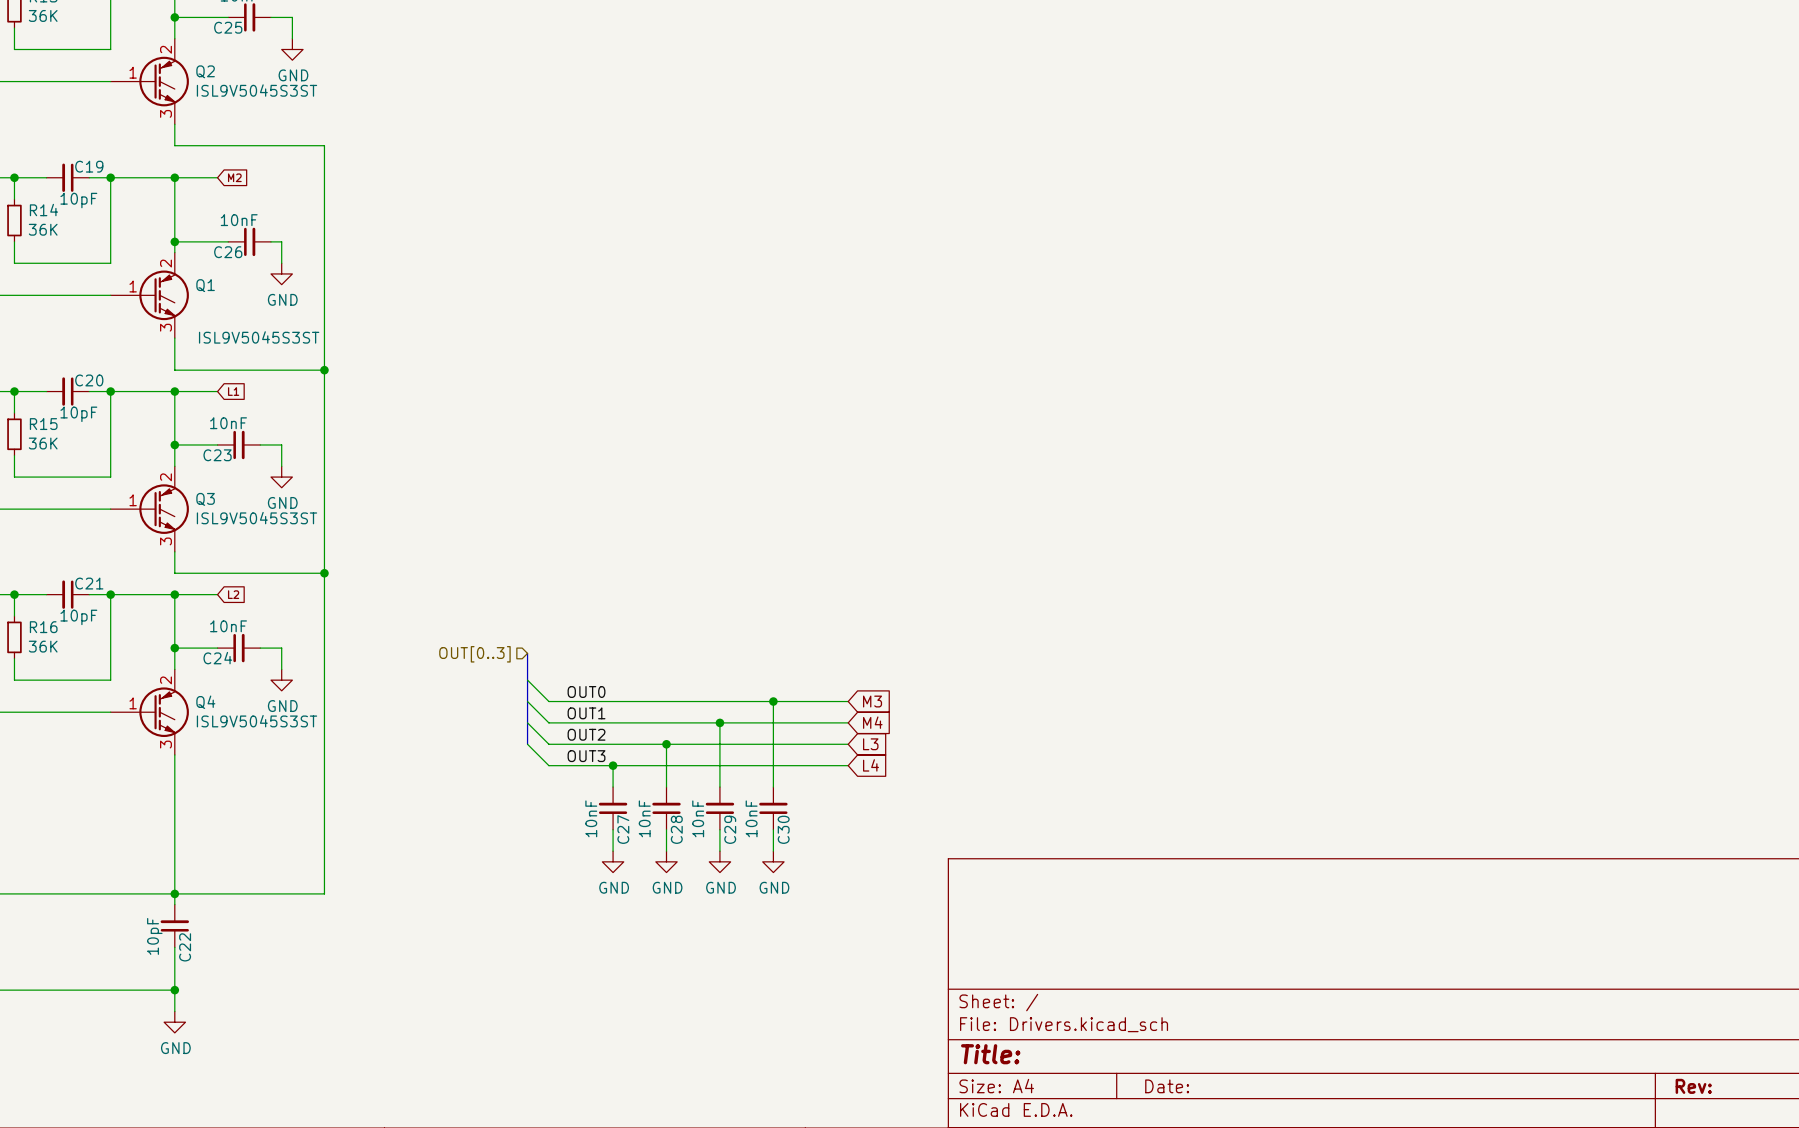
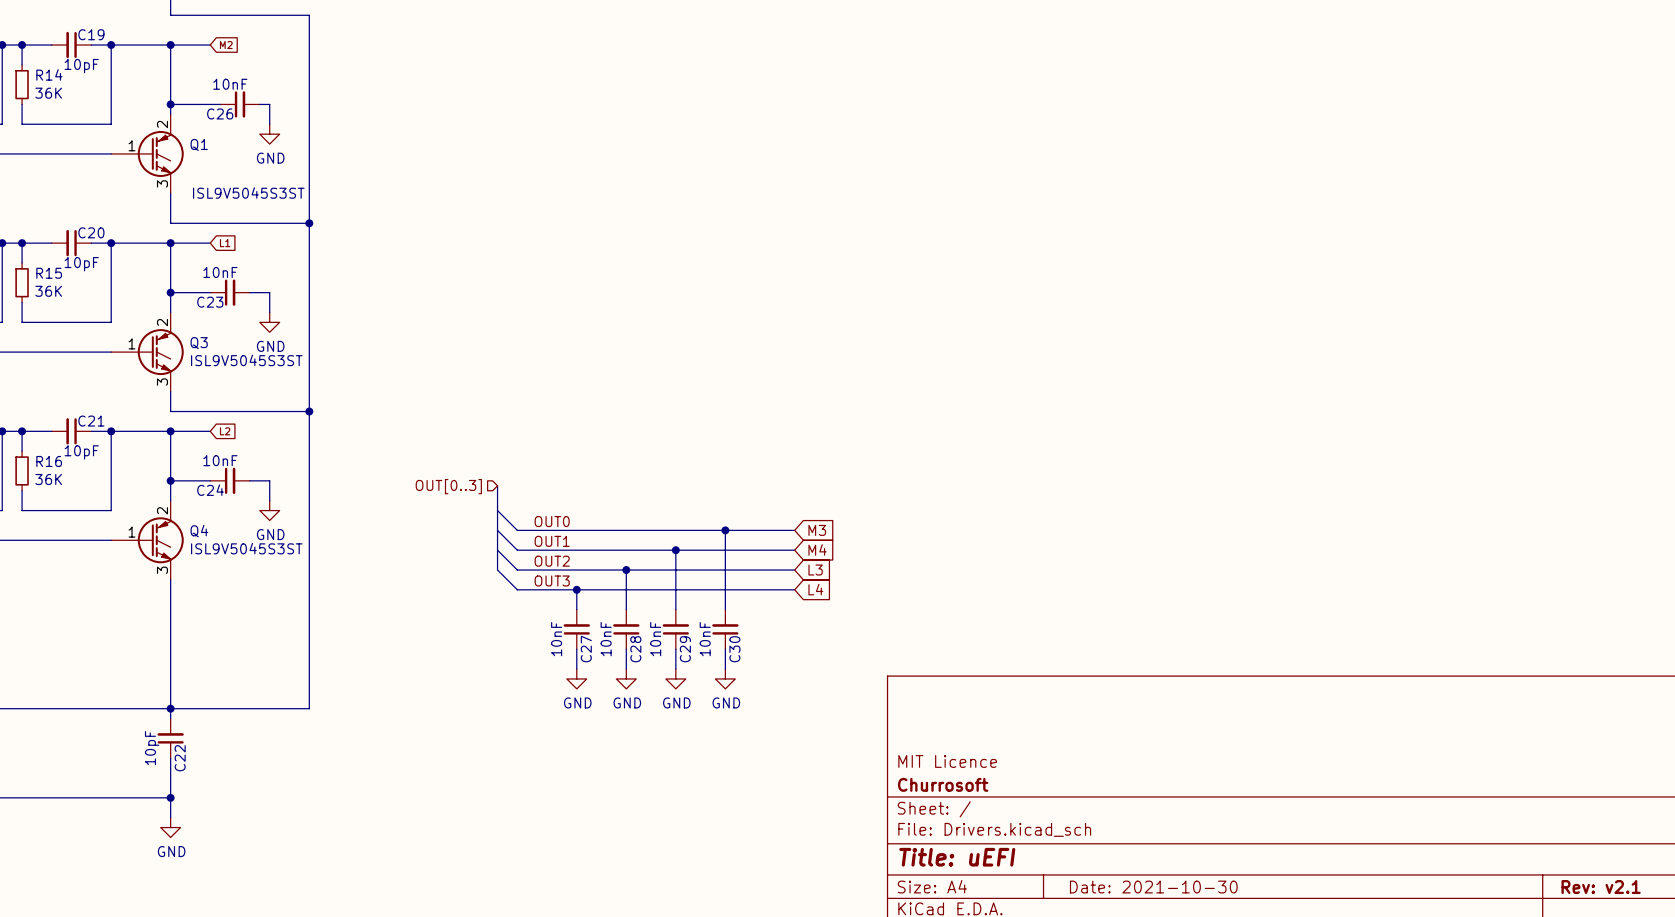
title block: none -> MIT Licence (947, 761)
title block: none -> Churrosoft (943, 784)
title block: Title: (990, 1054) -> Title: uEFI (957, 857)
title block: Date: (1167, 1086) -> Date: 2021-10-30 (1153, 887)
title block: Rev: (1693, 1086) -> Rev: v2.1 (1601, 887)

